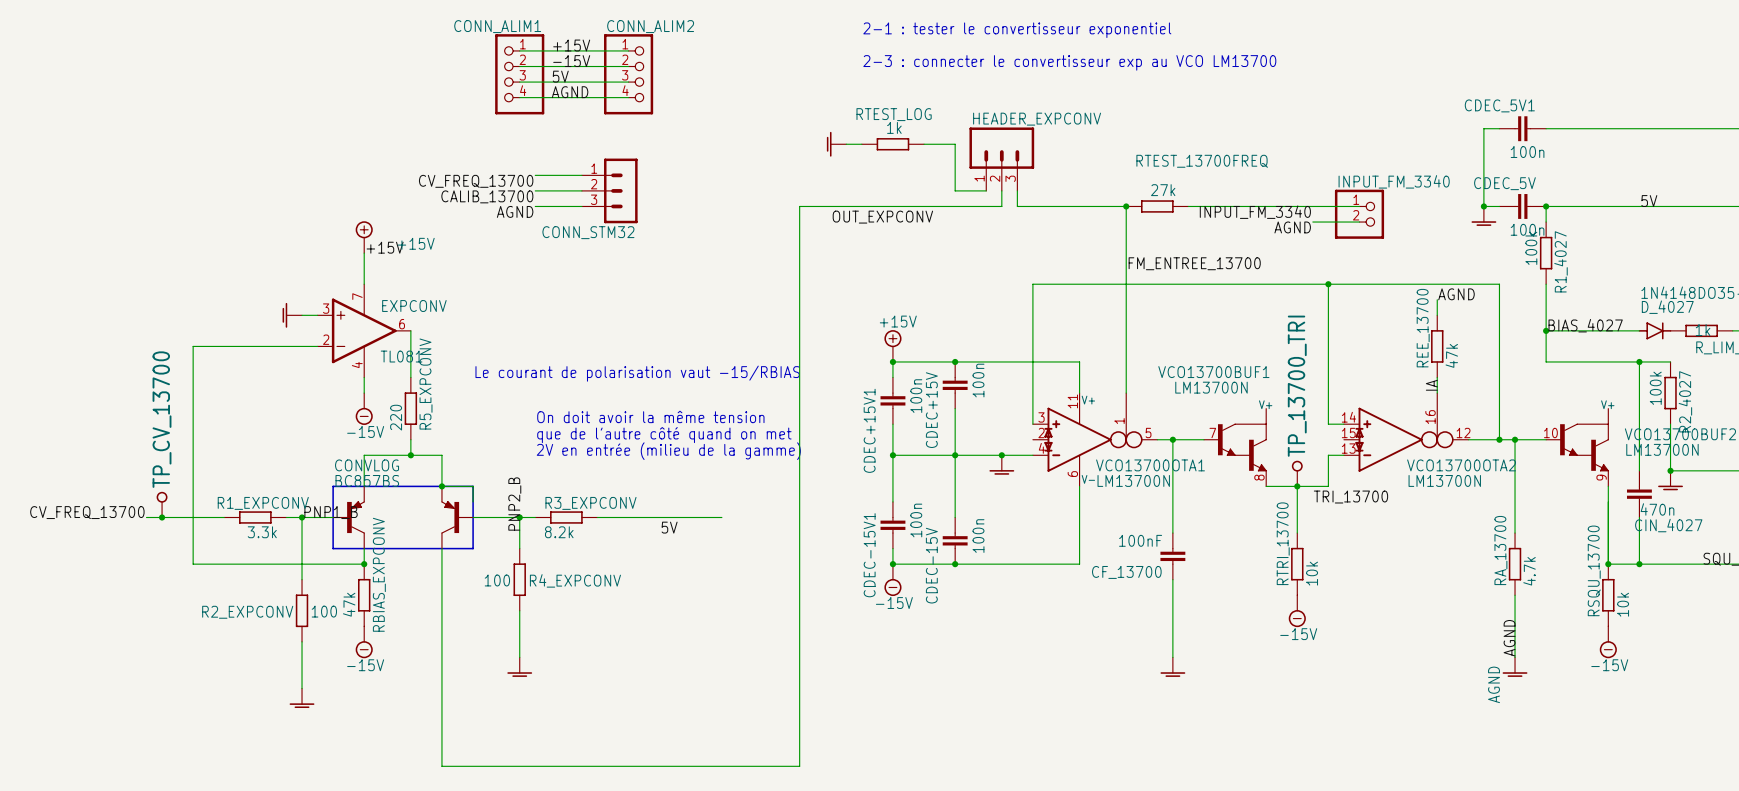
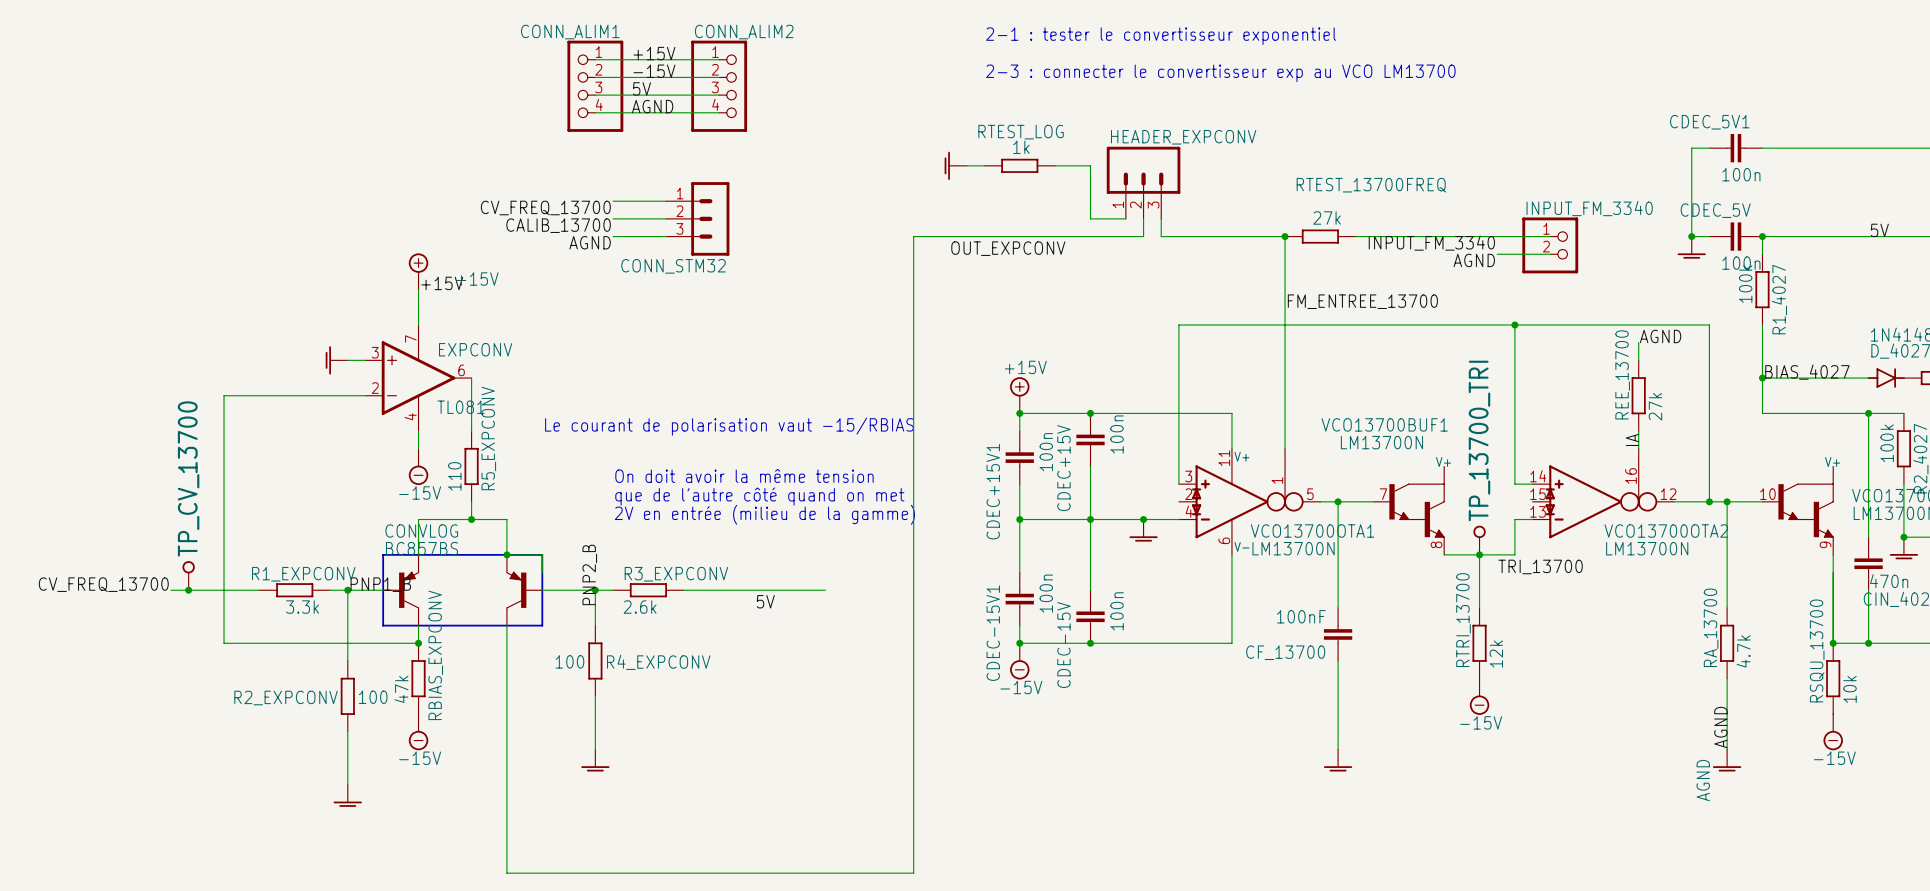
REE_13700 value: 47k (1451, 355) -> 27k (1655, 406)
R5_EXPCONV value: 220 (396, 417) -> 110 (454, 476)
R3_EXPCONV value: 8.2k (559, 532) -> 2.6k (640, 607)
RTRI_13700 value: 10k (1312, 573) -> 12k (1496, 654)

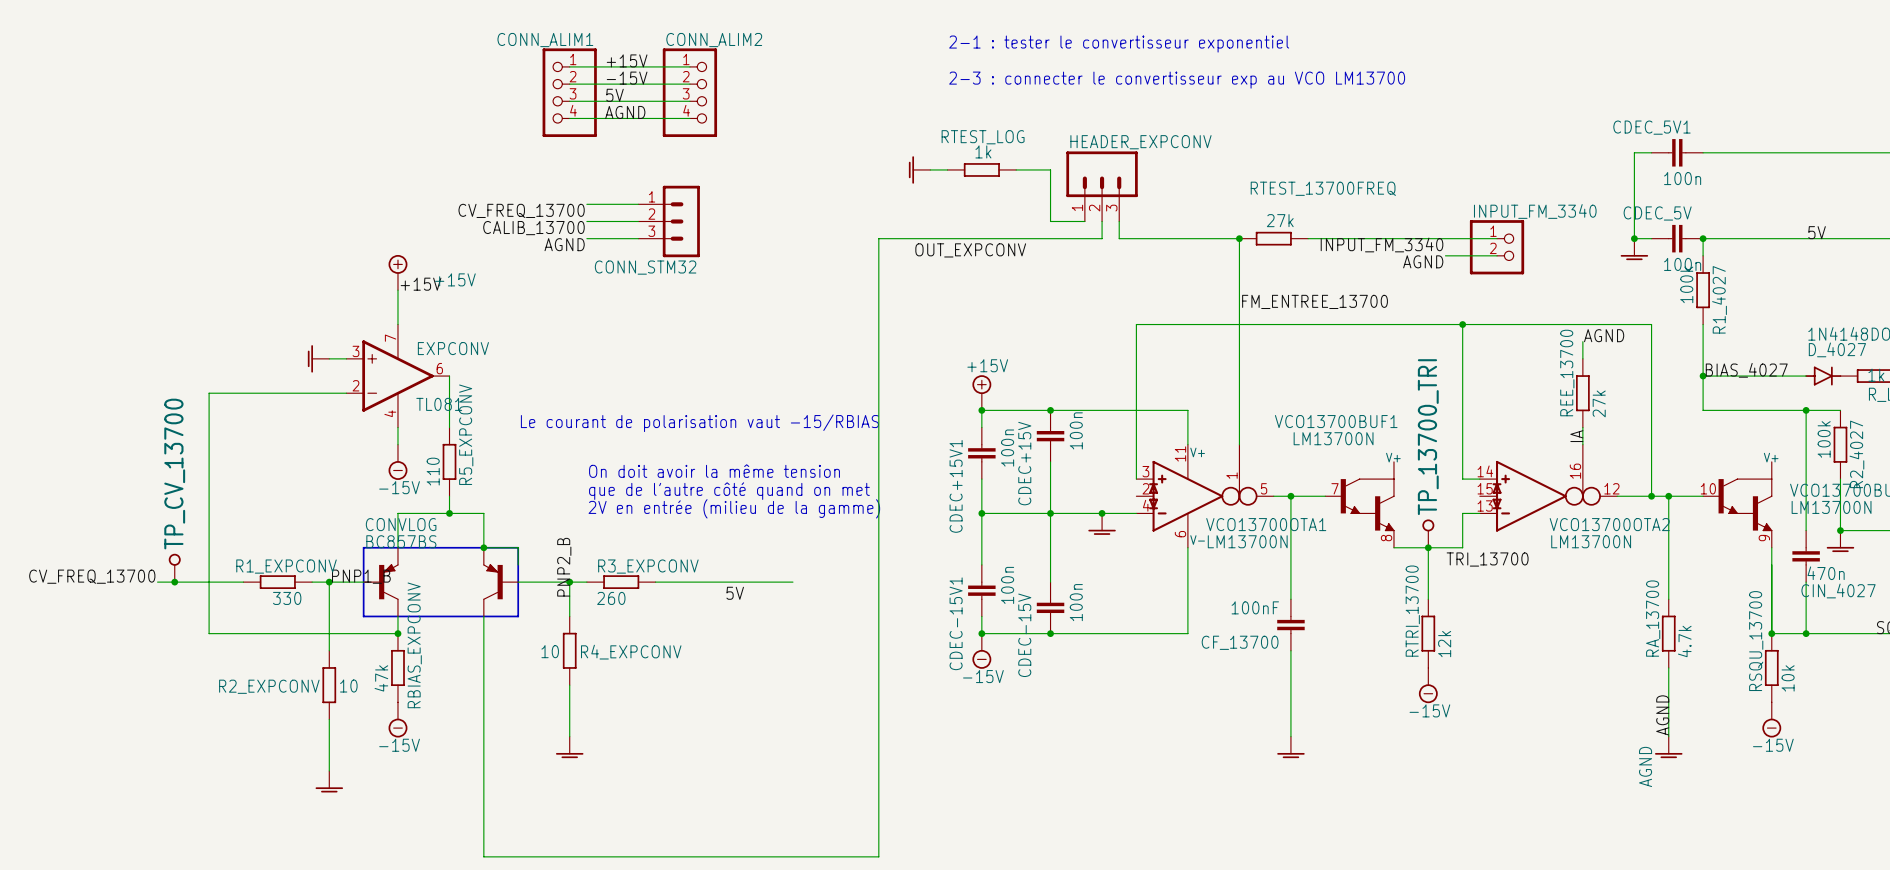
R1_EXPCONV value: 3.3k (302, 607) -> 330 (287, 598)
R3_EXPCONV value: 2.6k (640, 607) -> 260 (611, 598)
R4_EXPCONV value: 100 (569, 661) -> 10 (550, 651)
R2_EXPCONV value: 100 (373, 697) -> 10 (348, 686)

